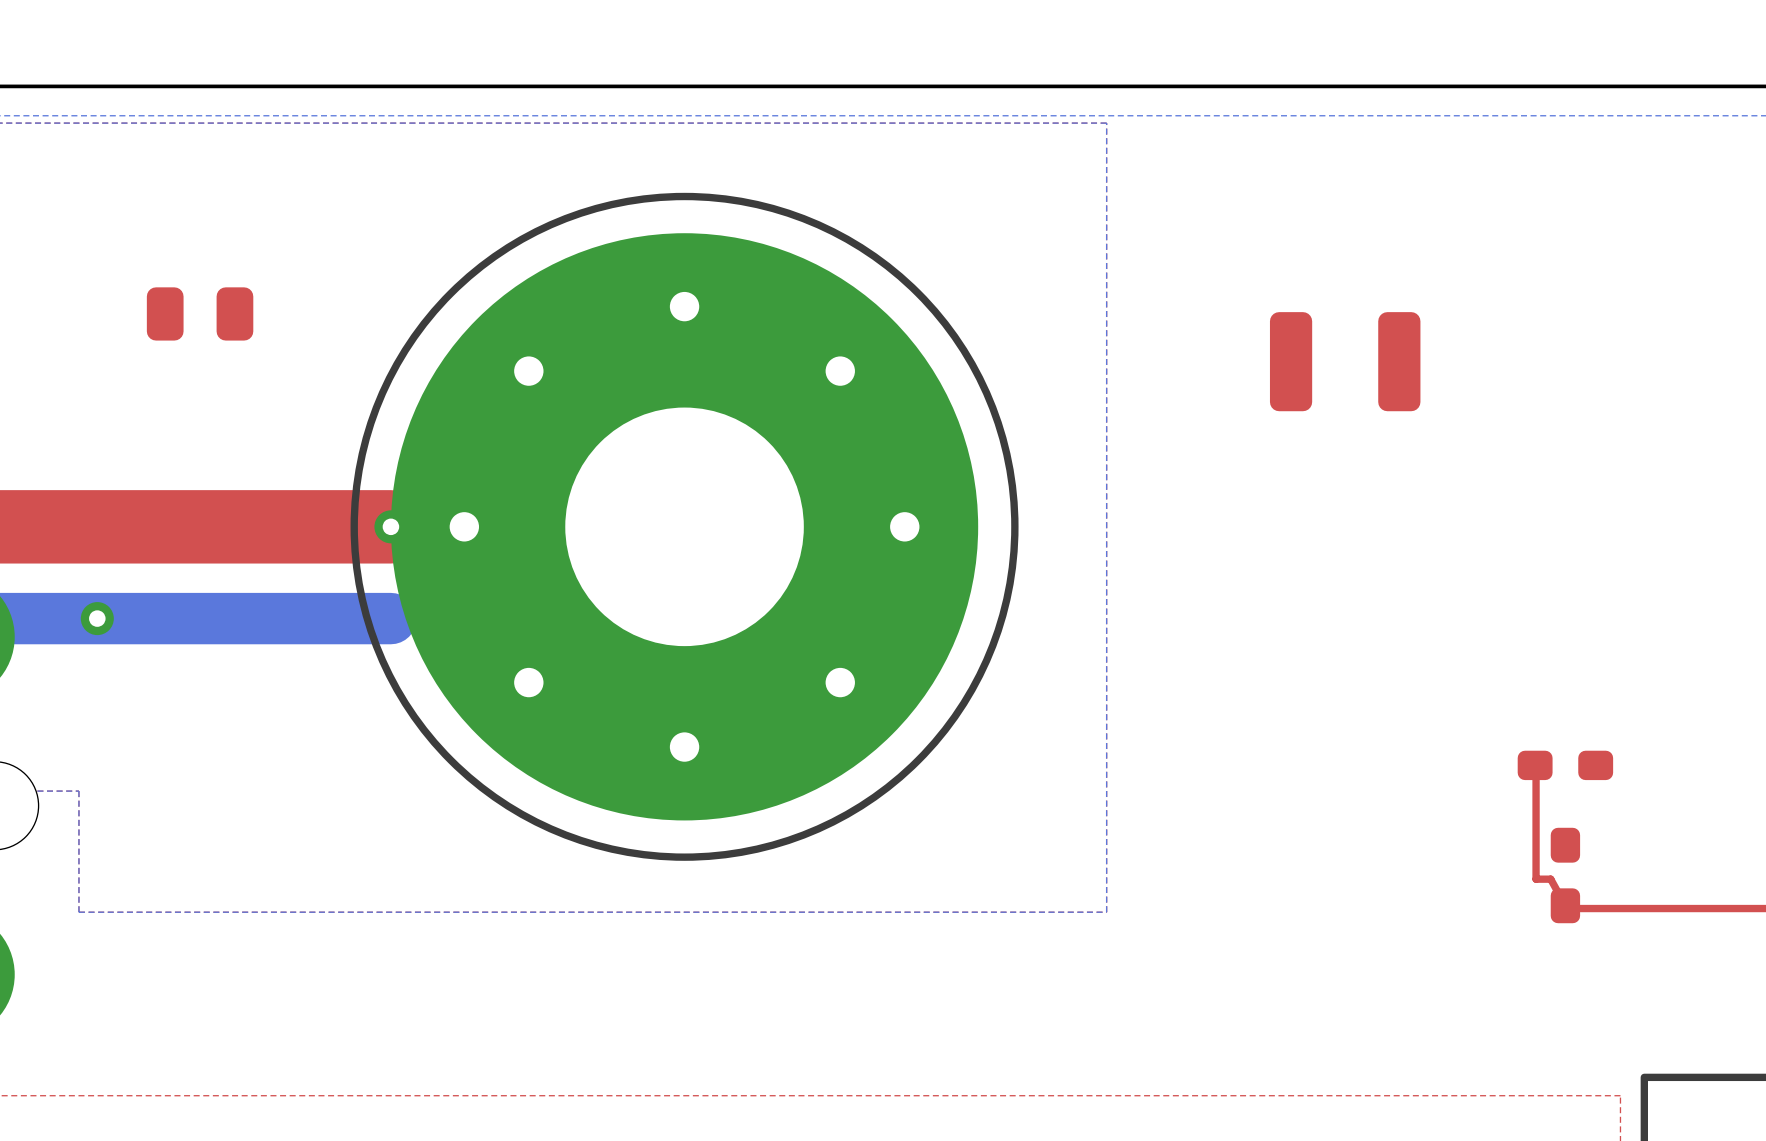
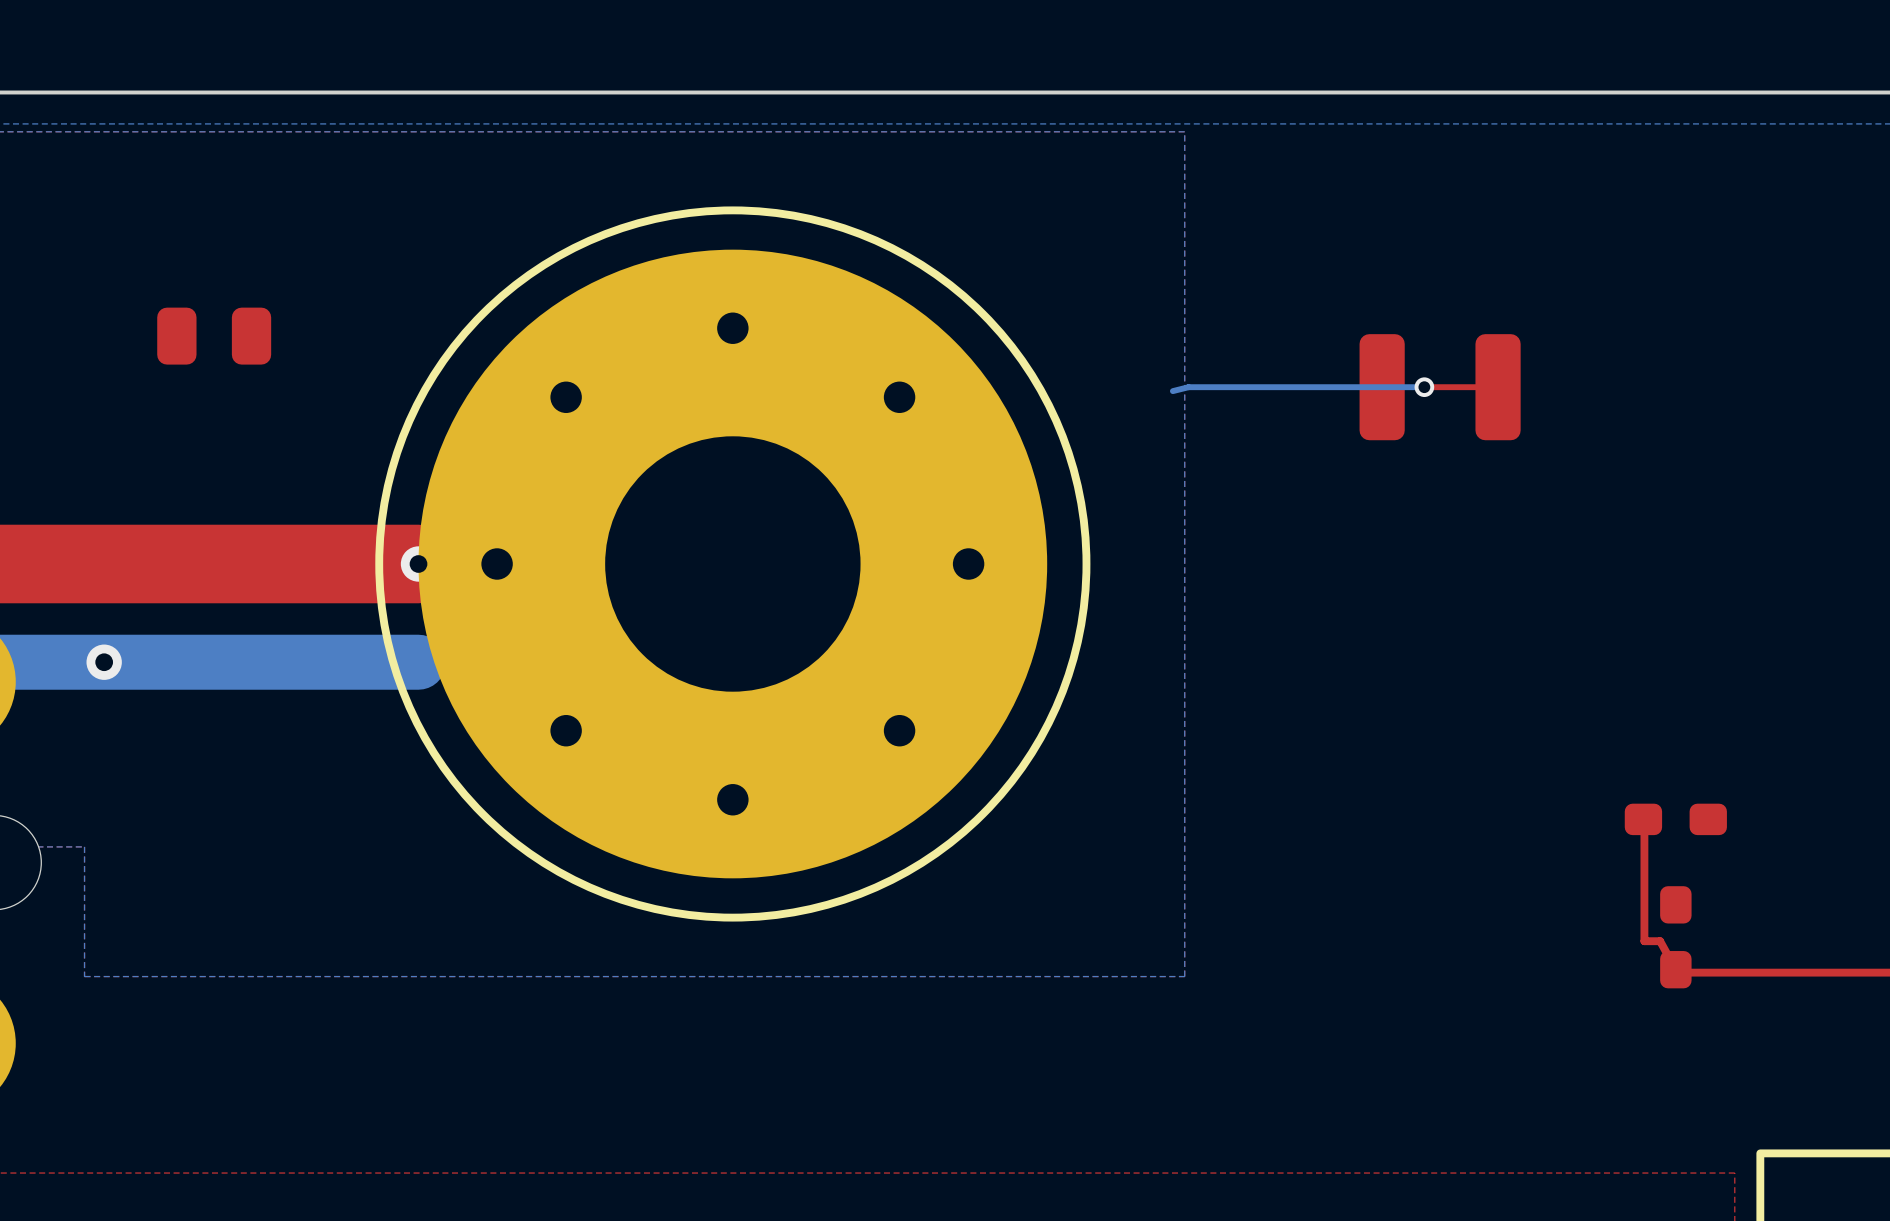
bottom track: none -> (1424, 387) (1188, 387) (1172, 391)
via: none -> (1424, 387)
top track: none -> (1498, 387) (1424, 387)

